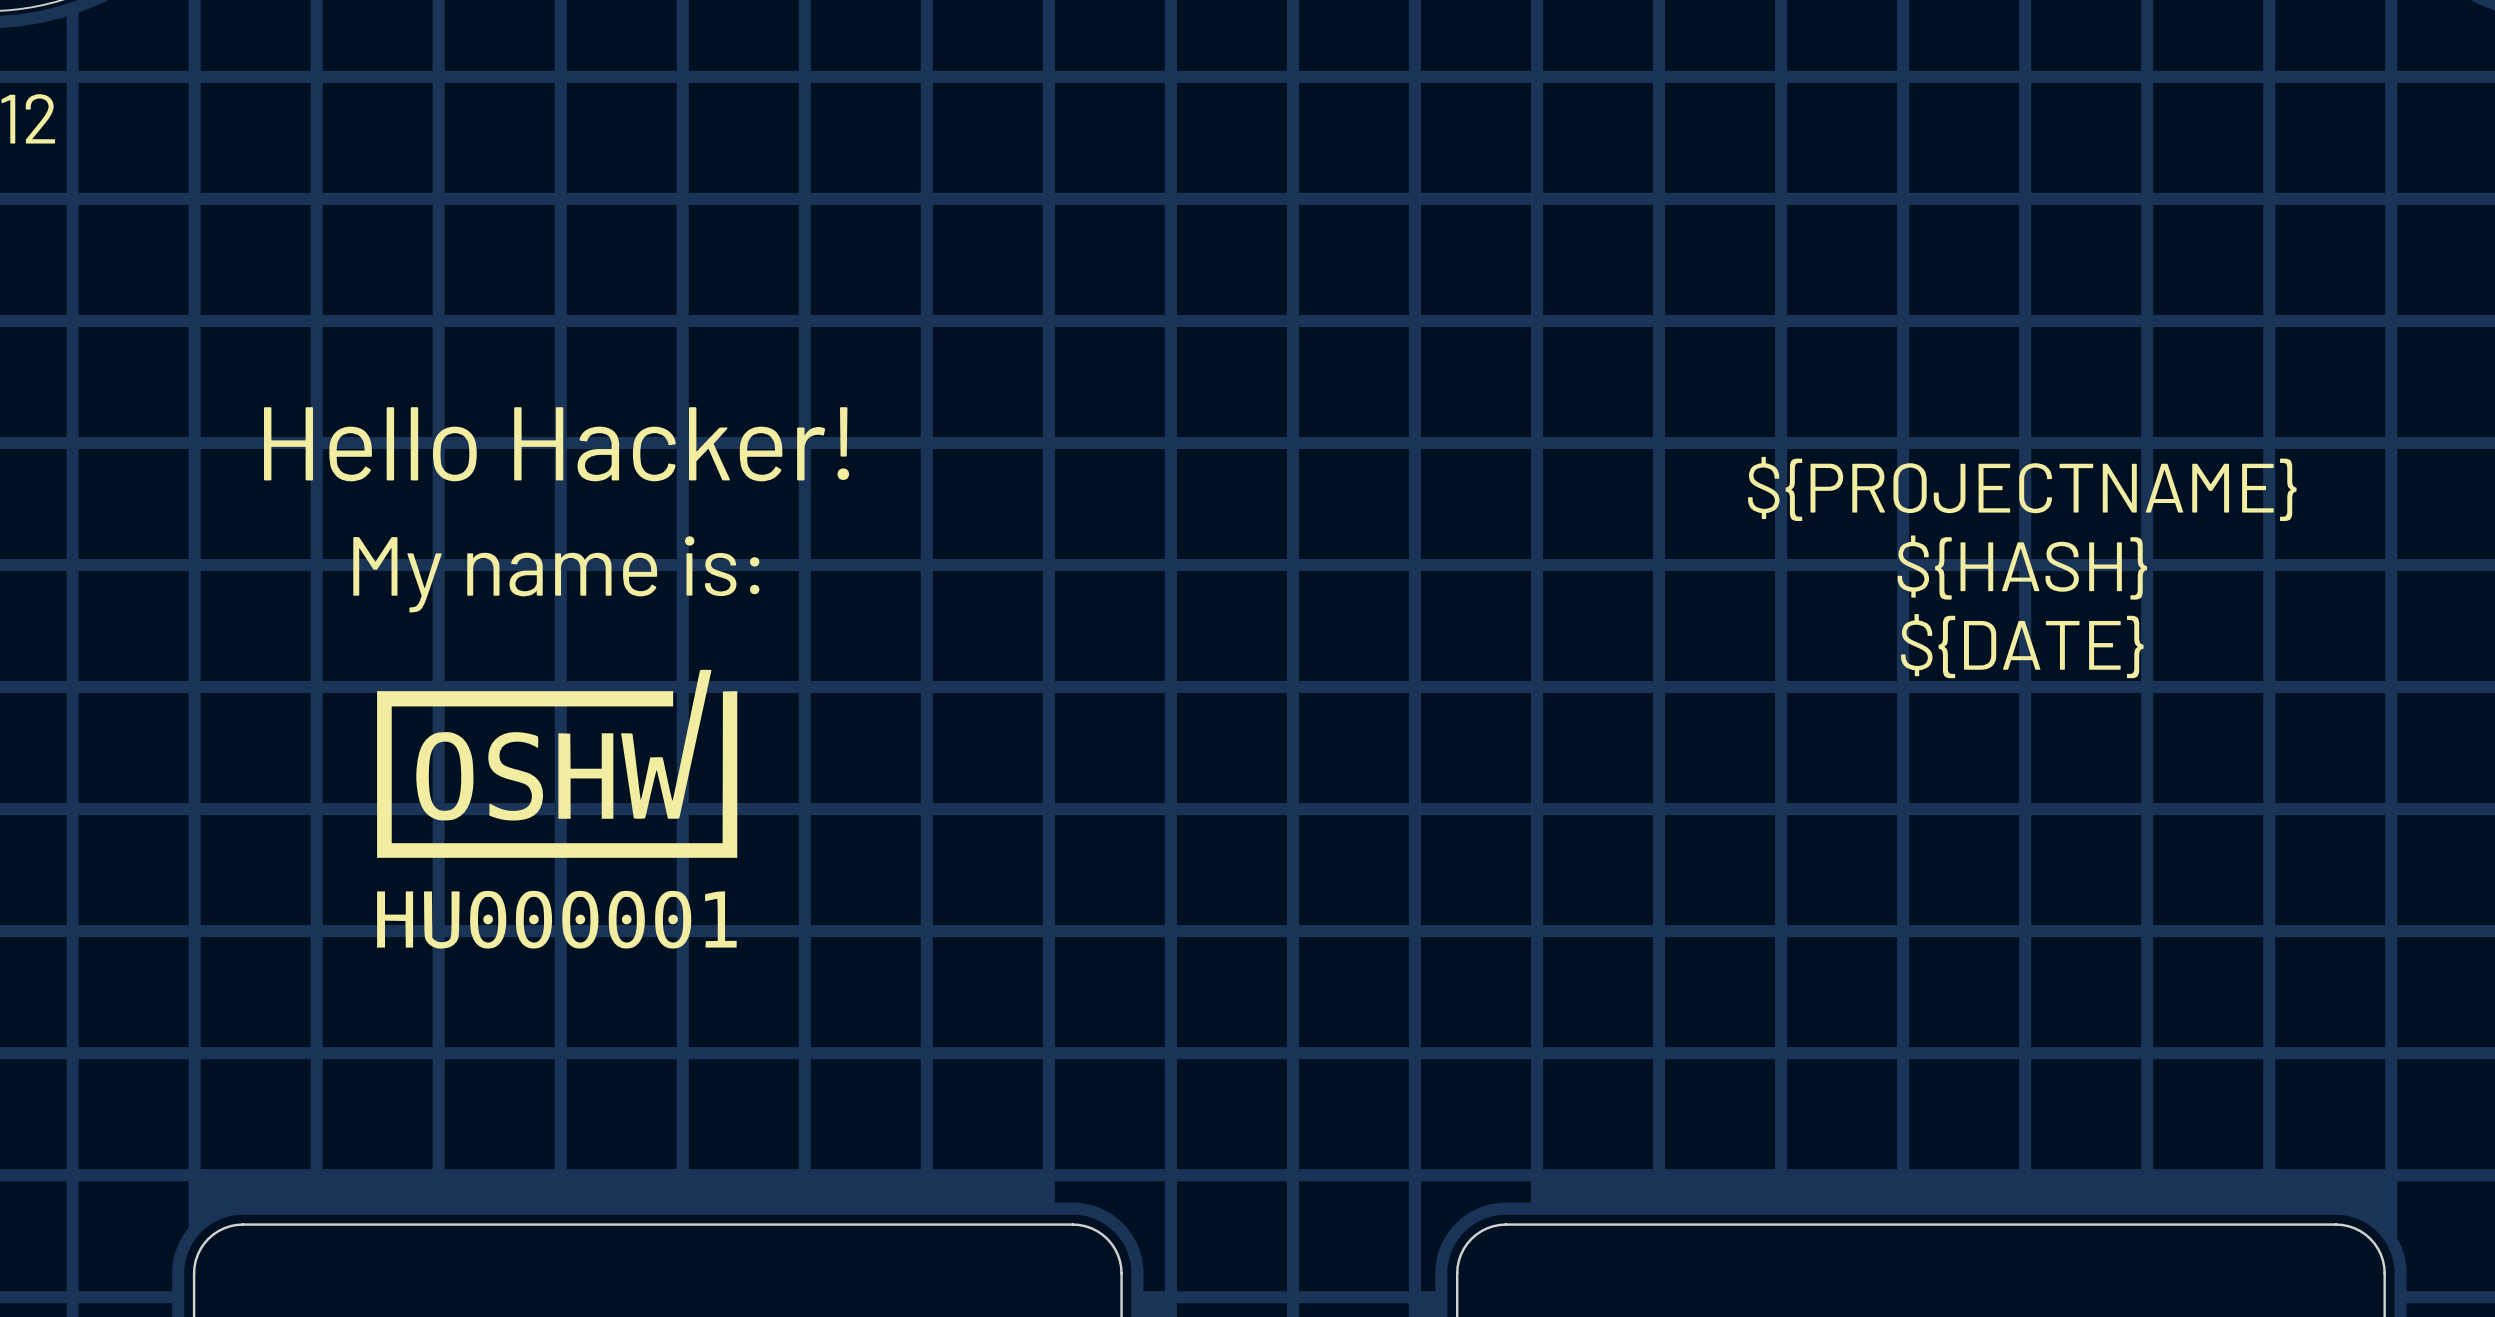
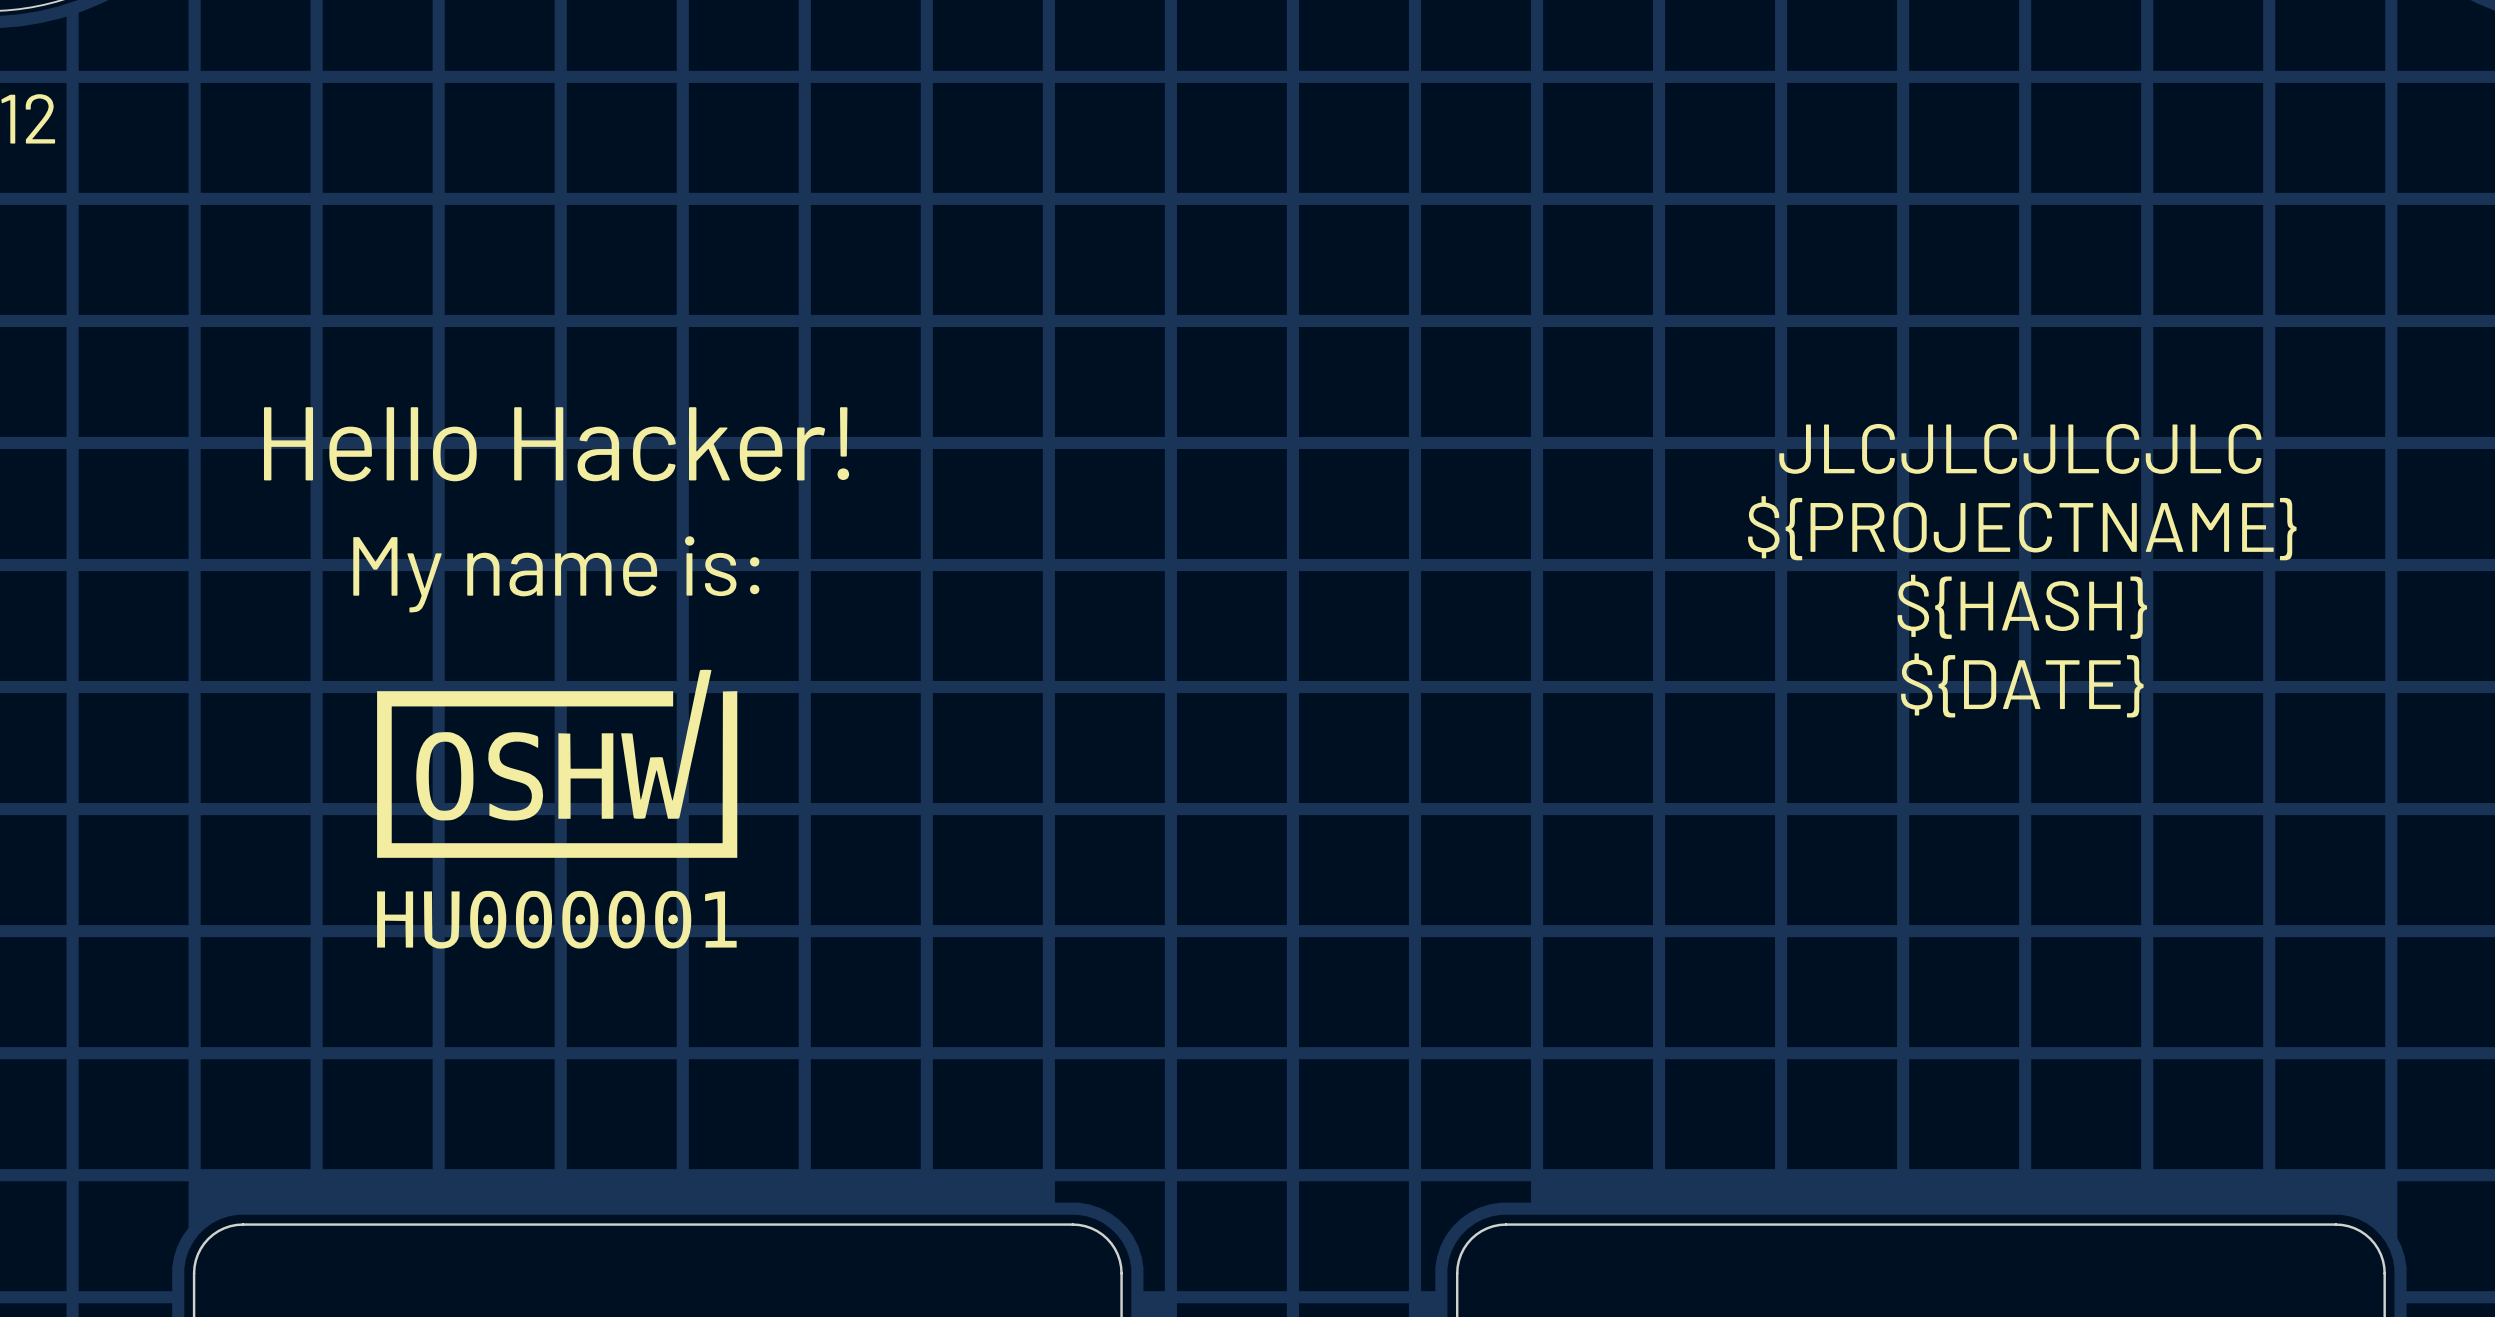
text: none -> JLCJLCJLCJLC (2020, 448)
text position: ${PROJECTNAME} (2022, 488) -> ${PROJECTNAME} (2022, 528)
text position: ${HASH} (2022, 567) -> ${HASH} (2022, 606)
text position: ${DATE} (2022, 646) -> ${DATE} (2022, 685)

